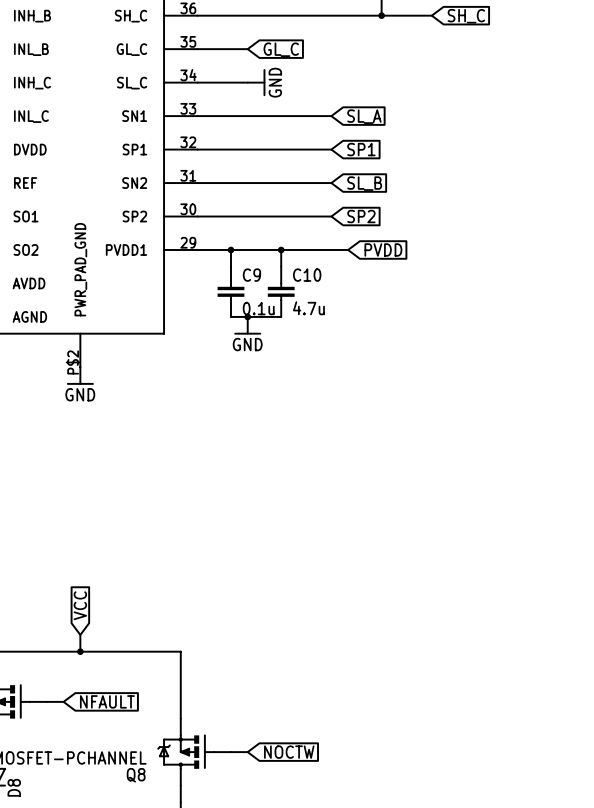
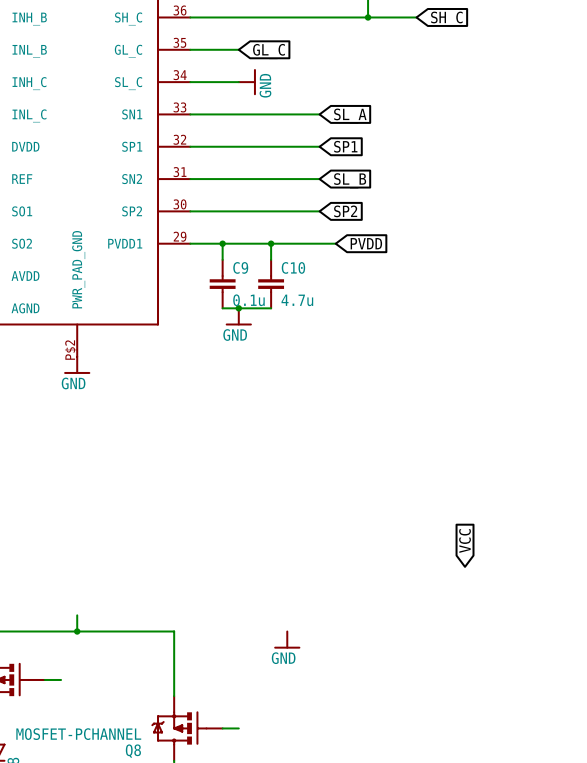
global label: none -> VCC (465, 541)
global label: VCC (80, 605) -> none
power symbol: none -> GND (287, 639)
global label: NFAULT (107, 701) -> none
global label: NOCTW (289, 752) -> none

